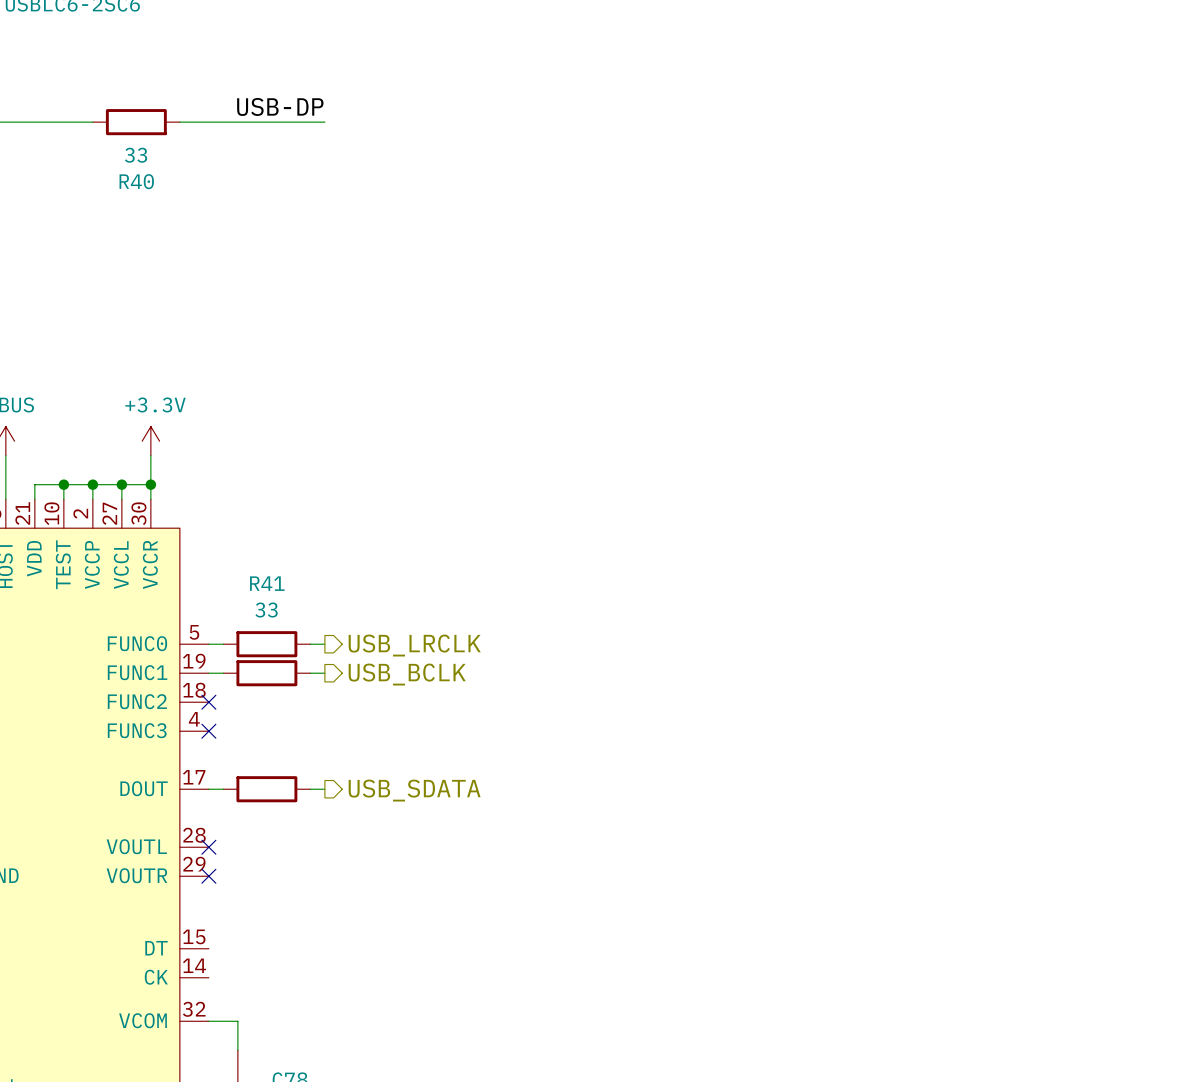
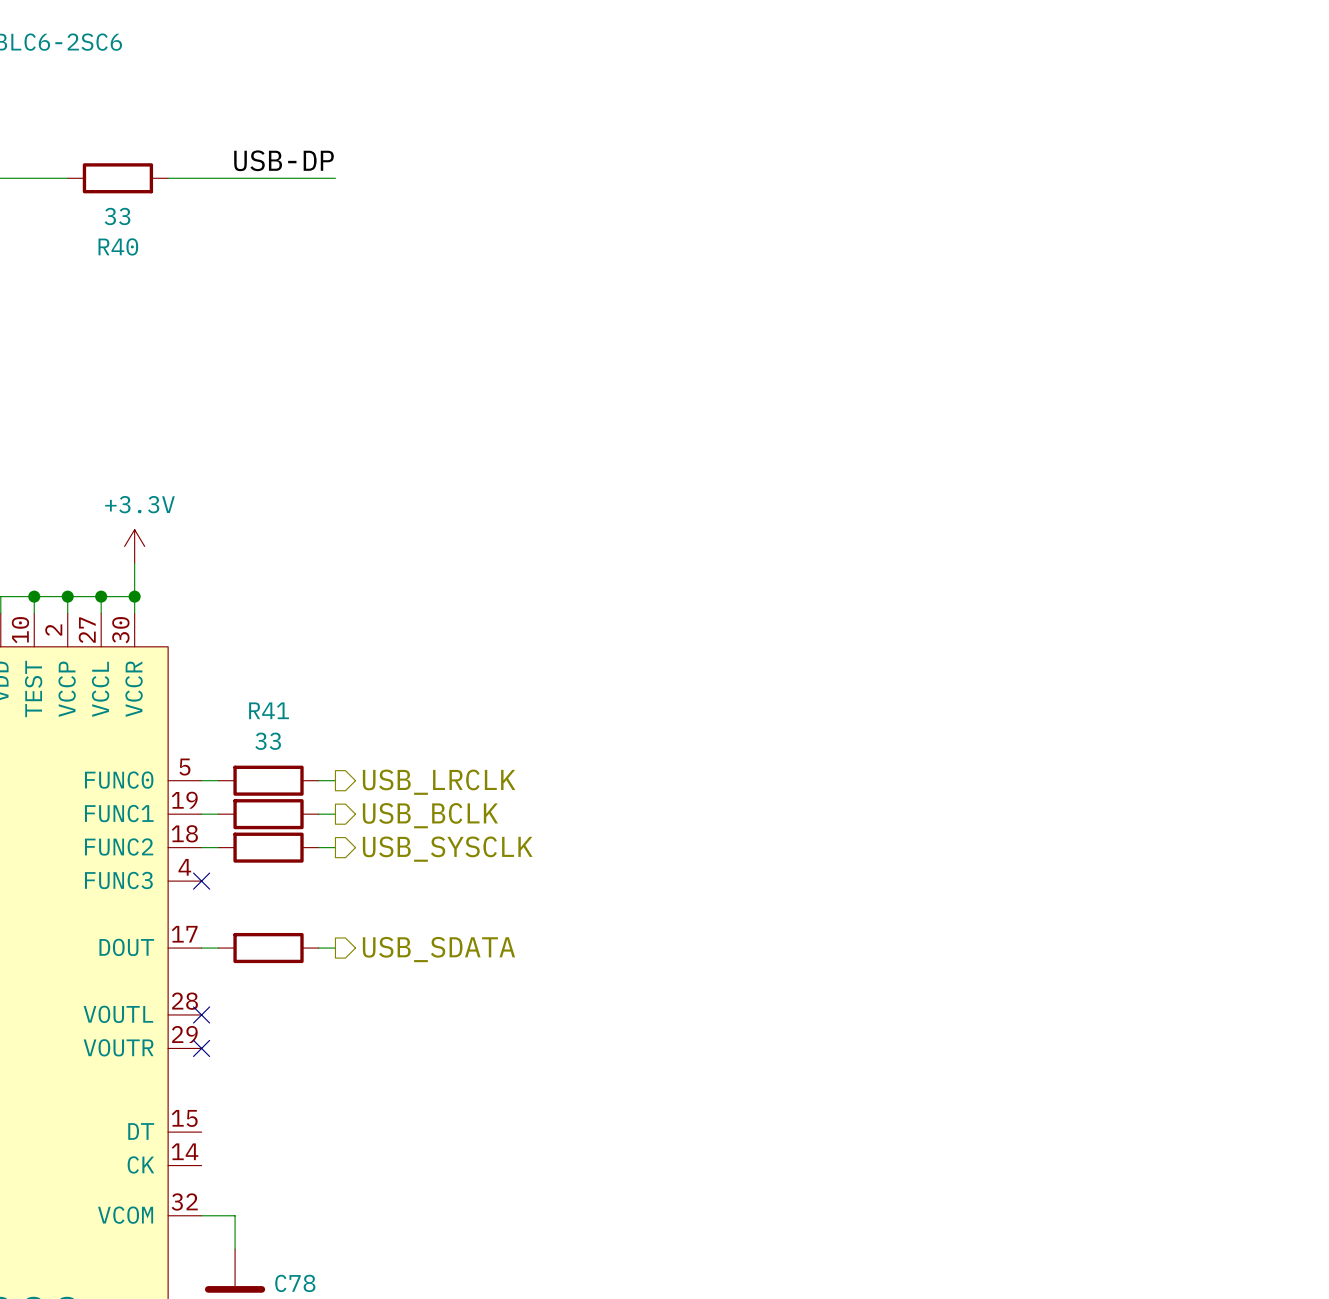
wire: none -> (201, 847) (218, 847)
no-connect mark: (208, 702) -> none
part: none -> (268, 847)
wire: none -> (318, 847) (335, 847)
hierarchical label: none -> USB_SYSCLK (447, 849)

